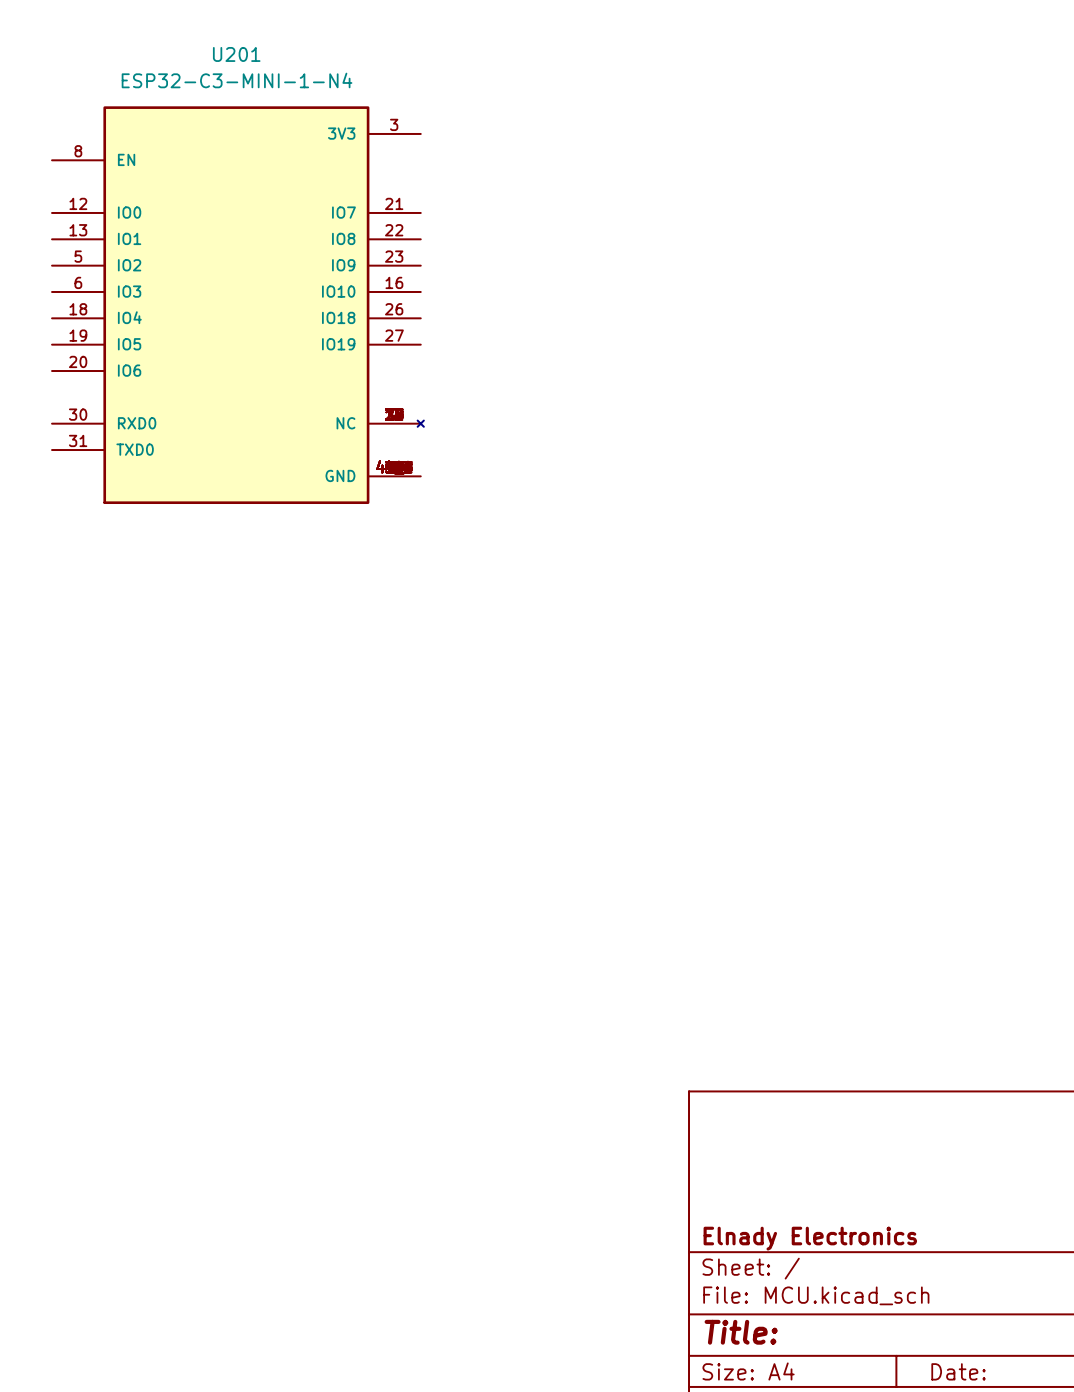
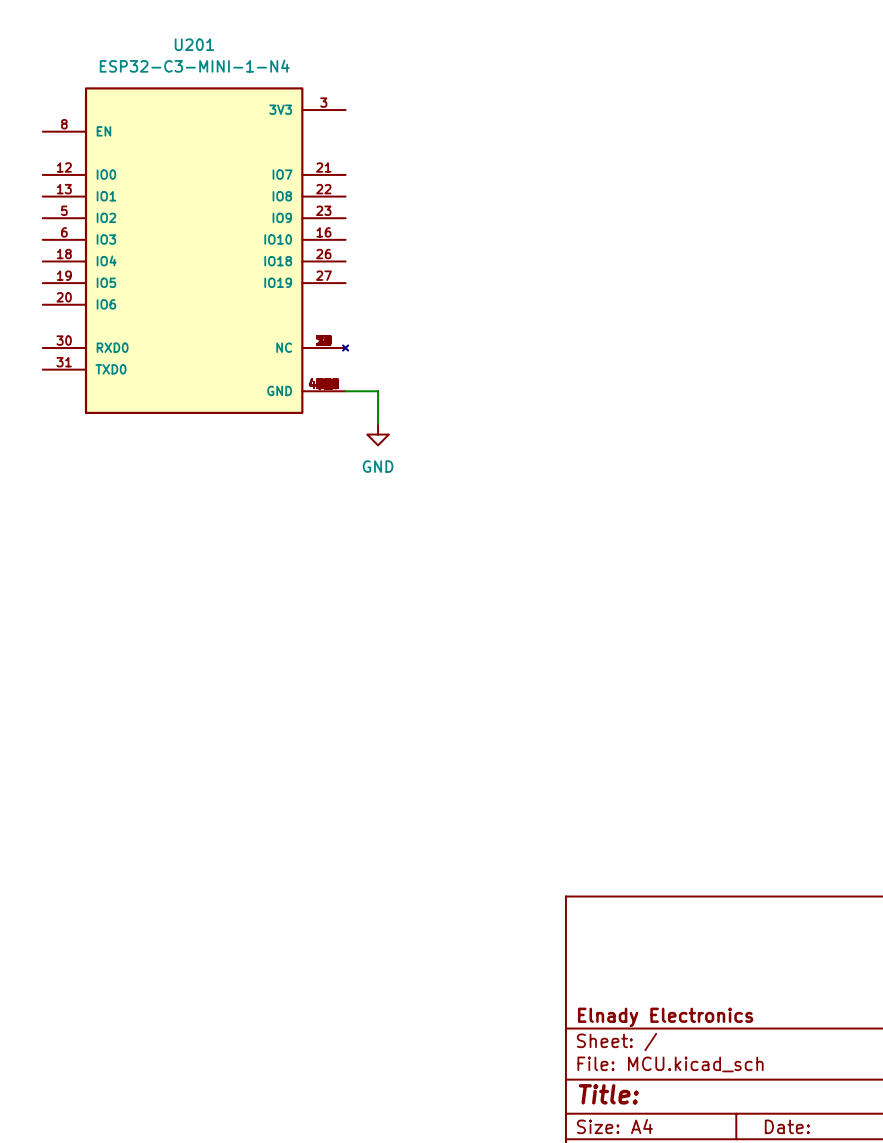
wire: none -> (345, 391) (378, 391) (378, 423)
power symbol: none -> GND (378, 434)

